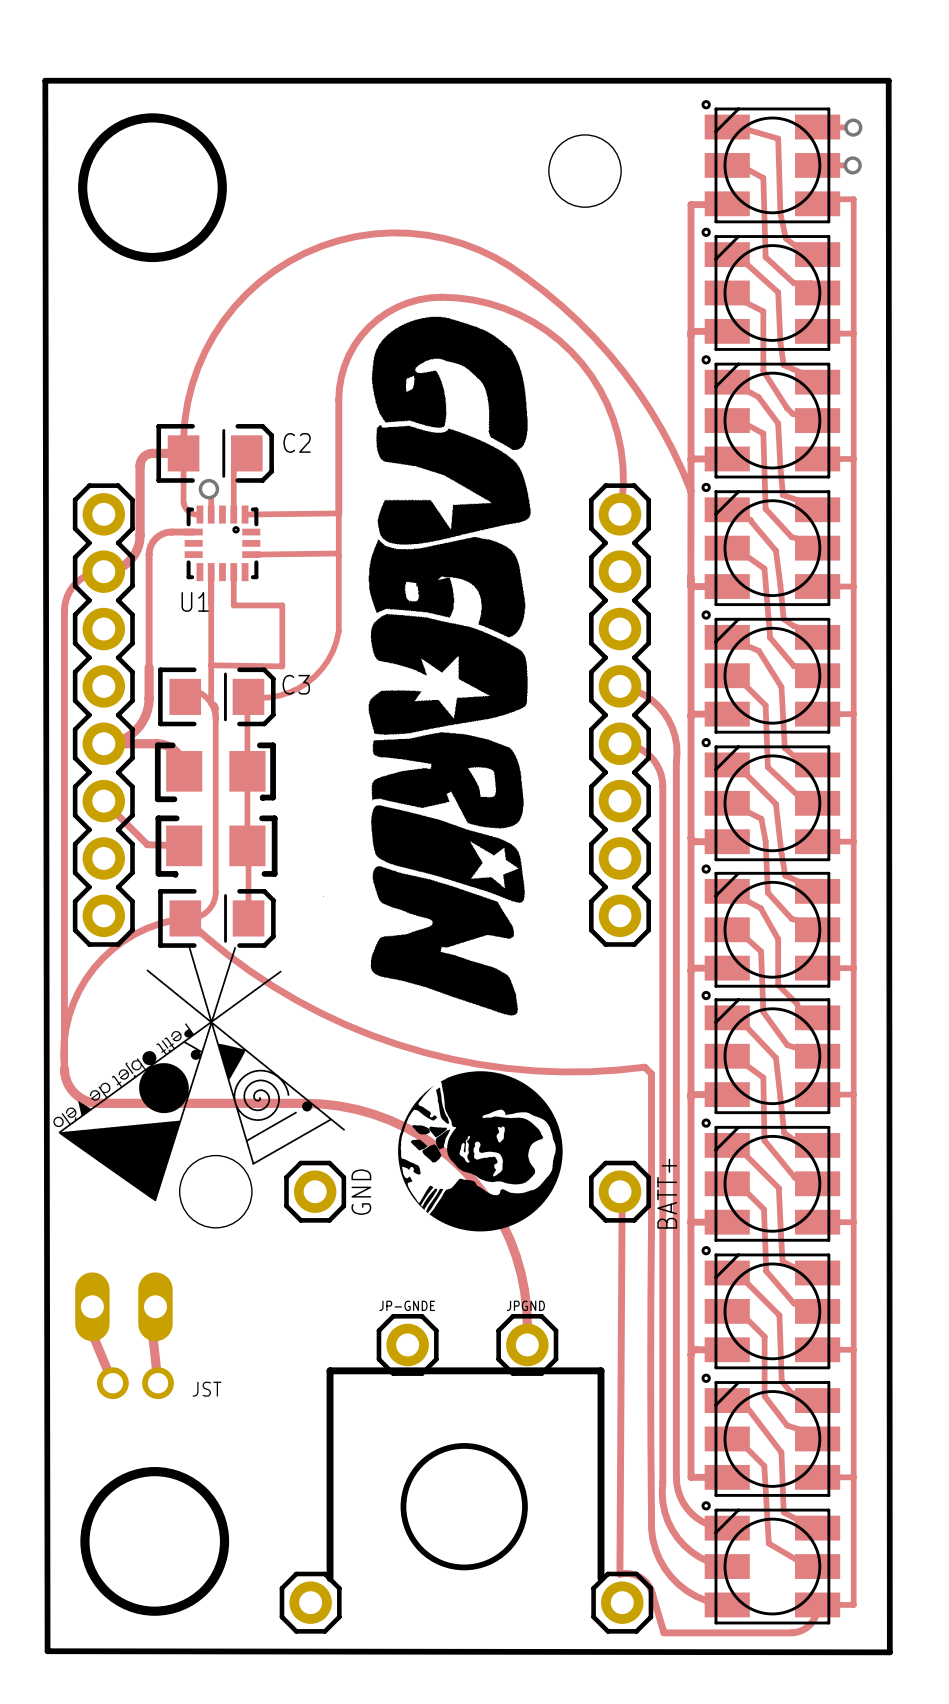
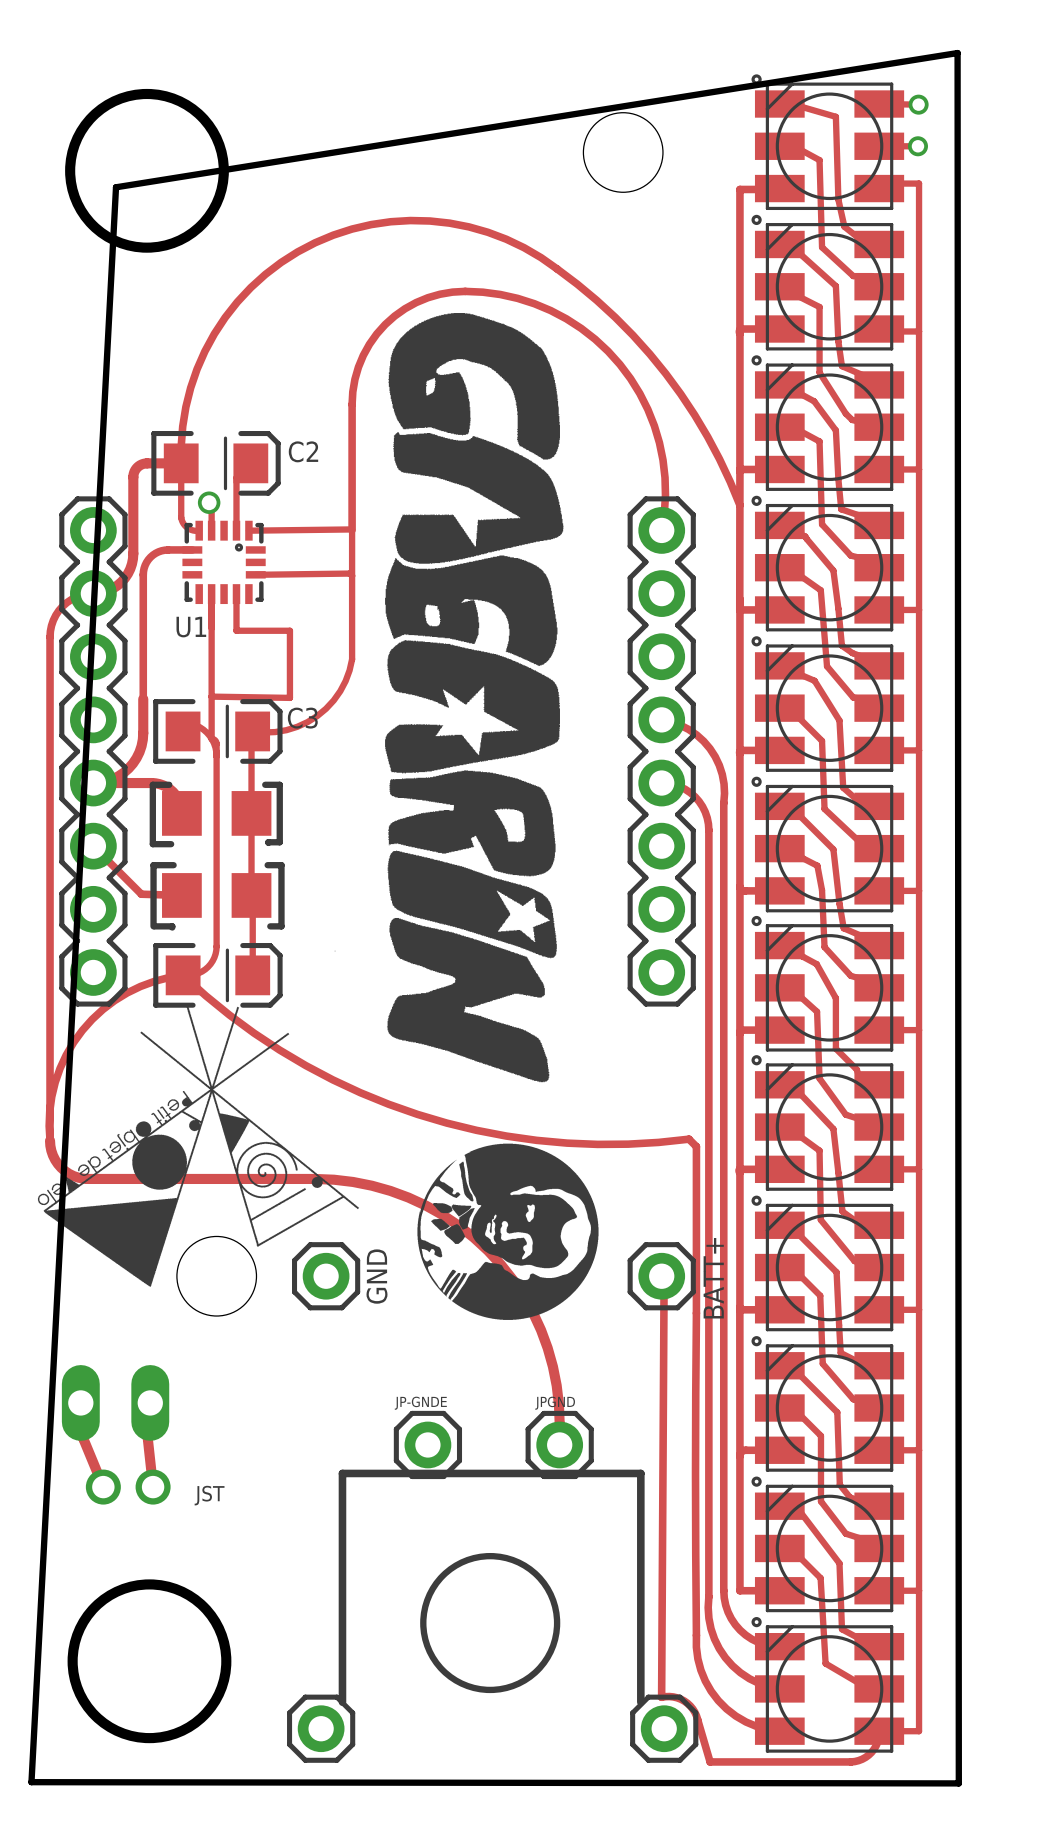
board edge: (888, 80) (45, 80) (47, 1651) -> (957, 53) (116, 187) (31, 1782)

